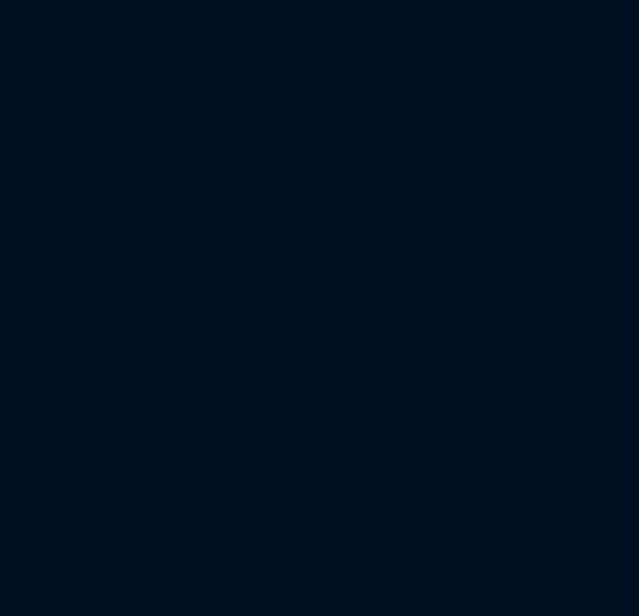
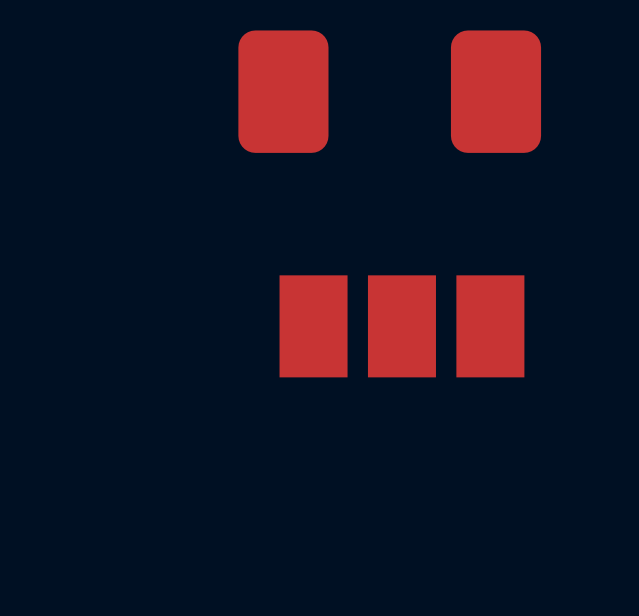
part: none -> (389, 91)
part: none -> (401, 326)

